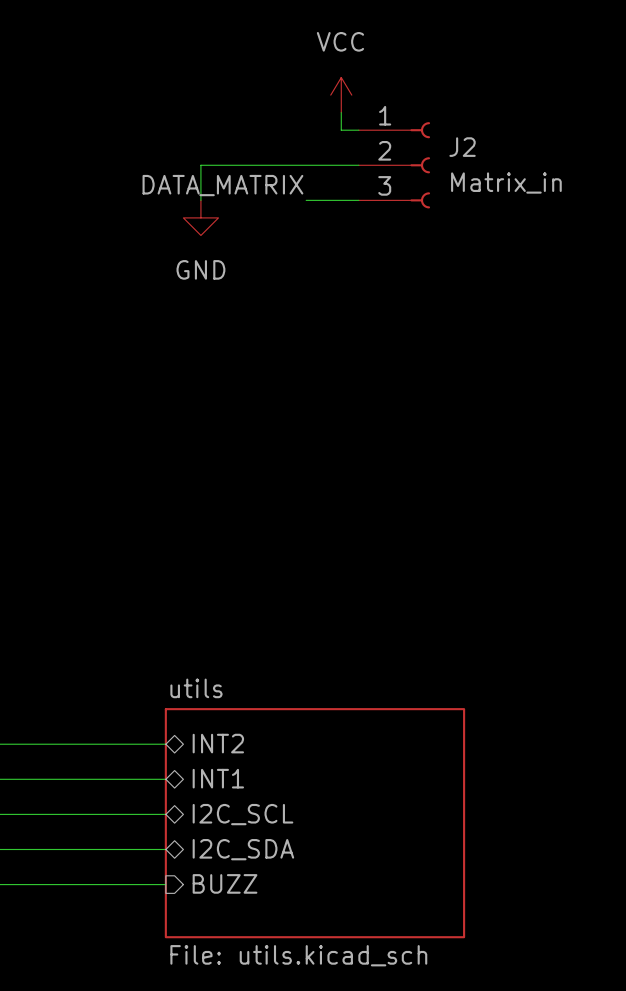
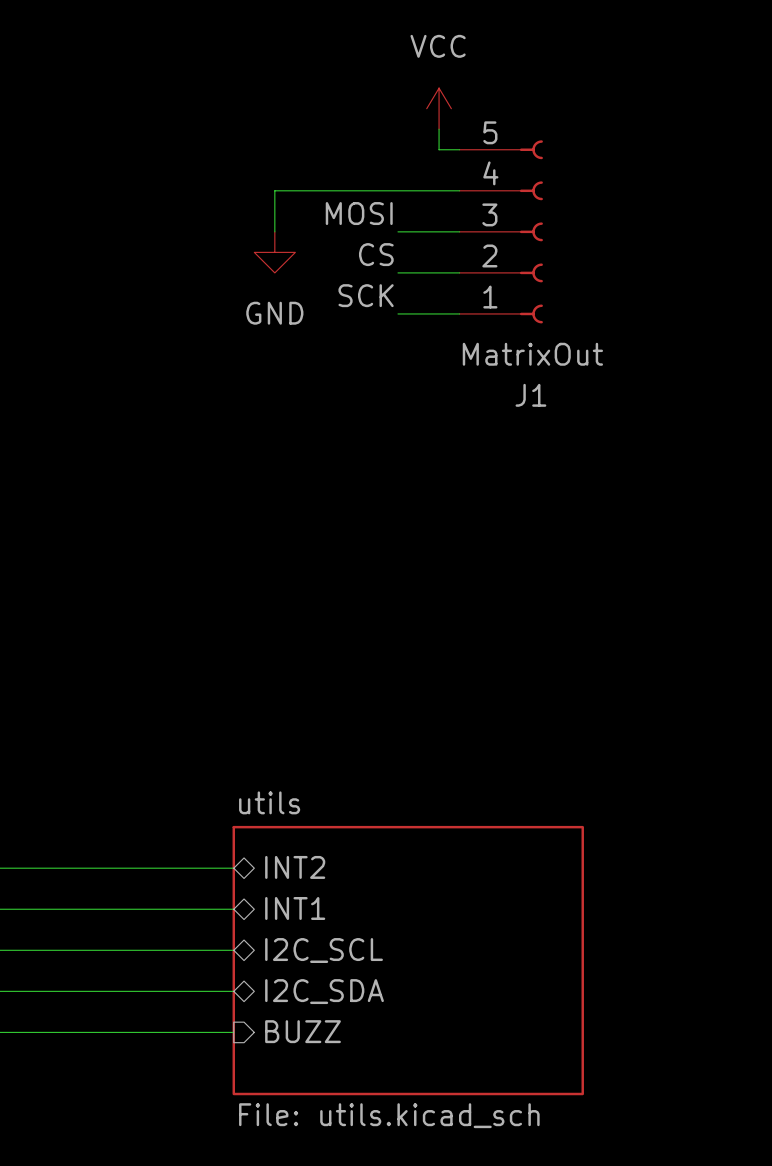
J2: Matrix_in (394, 165) -> none
label: DATA_MATRIX (222, 185) -> MOSI (359, 213)
J1: none -> MatrixOut (501, 231)
label: none -> CS (376, 254)
wire: none -> (397, 272) (459, 272)
label: none -> SCK (366, 295)
wire: none -> (397, 313) (459, 313)

